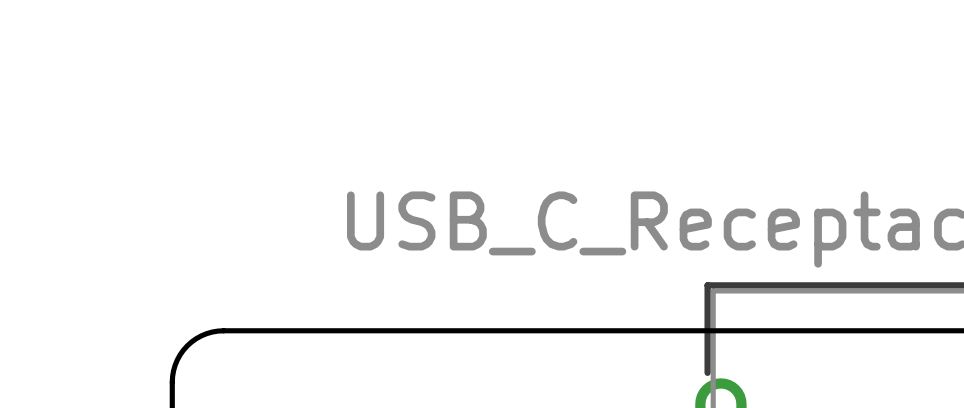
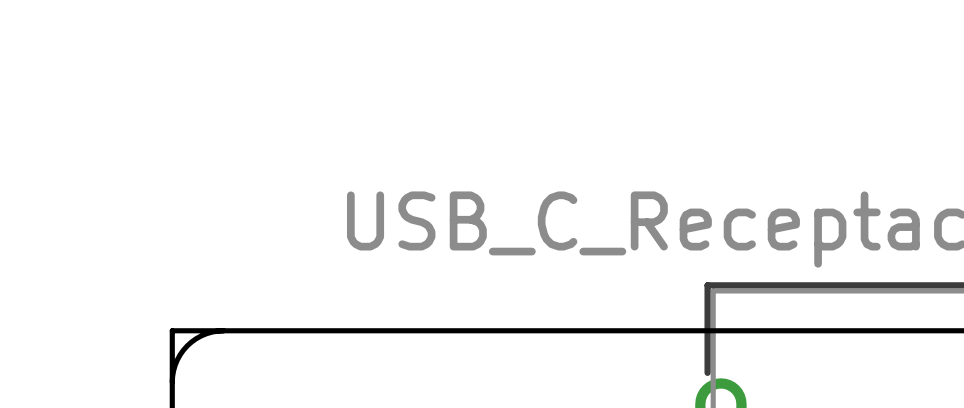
board edge: none -> (223, 330) (172, 330) (172, 382)

